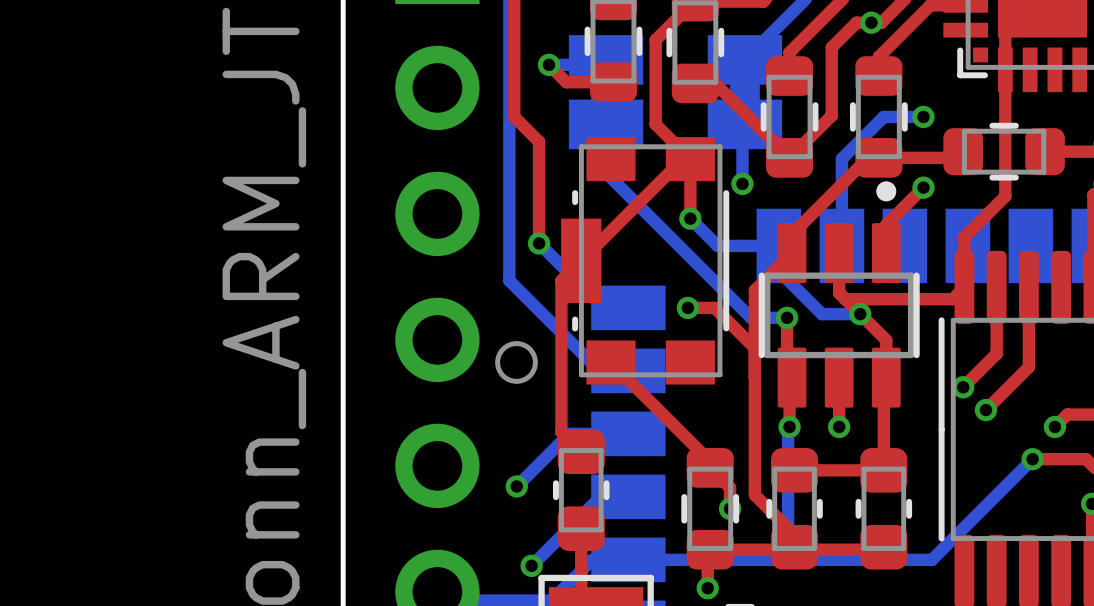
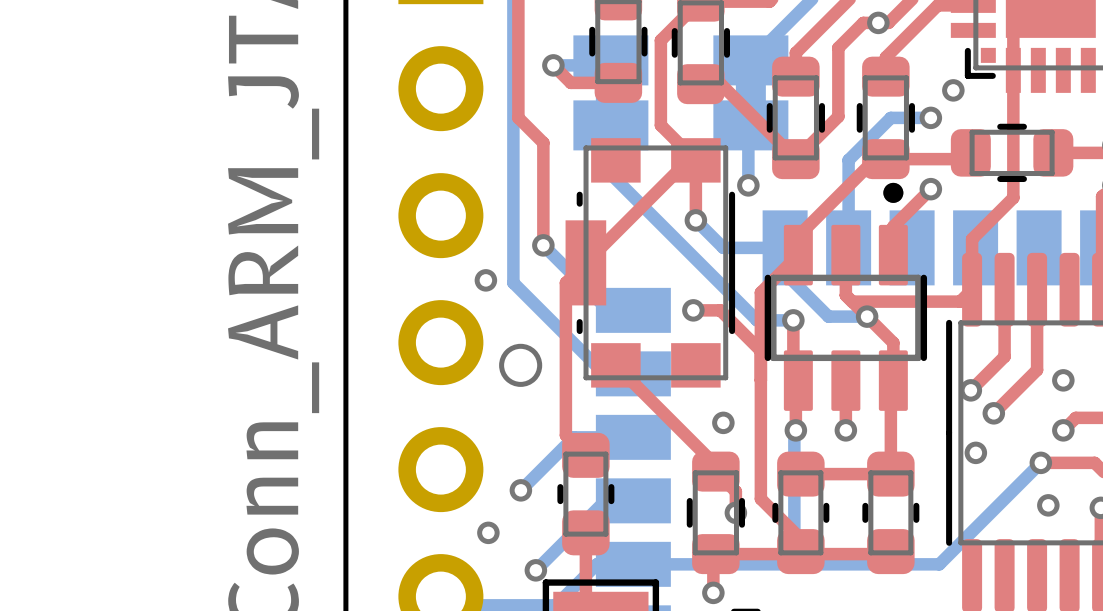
via: none -> (953, 90)
via: none -> (485, 280)
via: none -> (1063, 380)
via: none -> (723, 422)
via: none -> (975, 452)
via: none -> (1048, 505)
via: none -> (488, 532)

